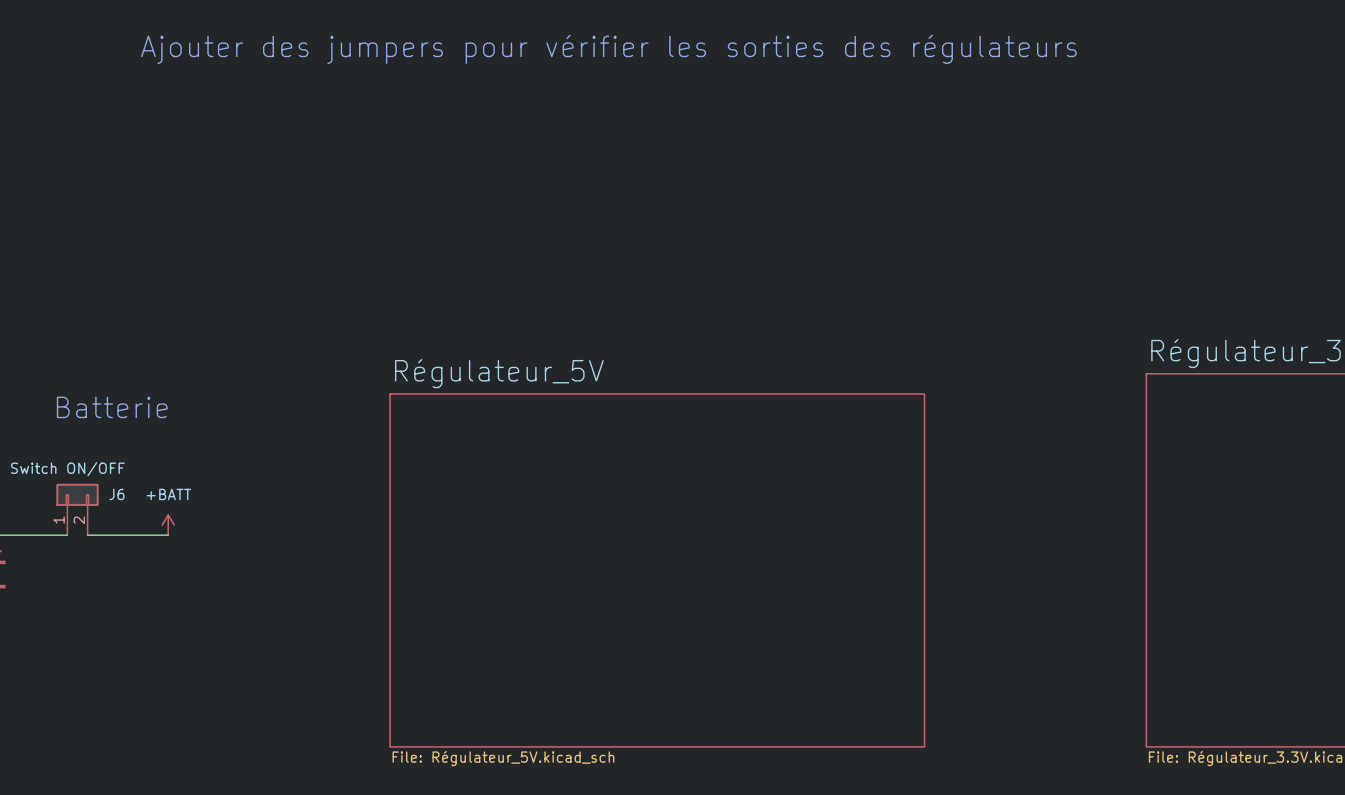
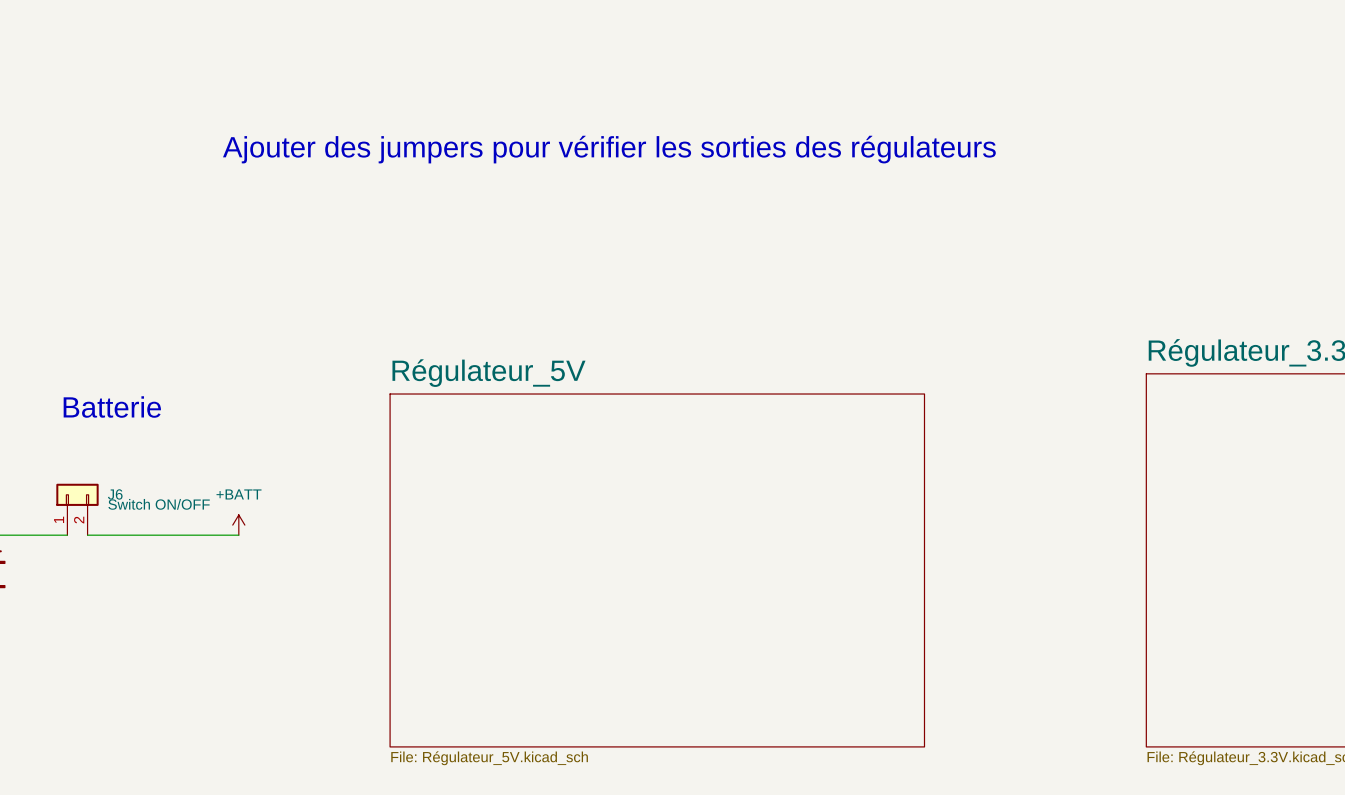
text position: Ajouter des jumpers pour vérifier les sorties des régulateurs (608, 49) -> Ajouter des jumpers pour vérifier les sorties des régulateurs (609, 149)
J6 value position: Switch ON/OFF (67, 469) -> Switch ON/OFF (159, 504)
power symbol position: +BATT (168, 525) -> +BATT (238, 525)
wire: none -> (168, 535) (238, 535)

